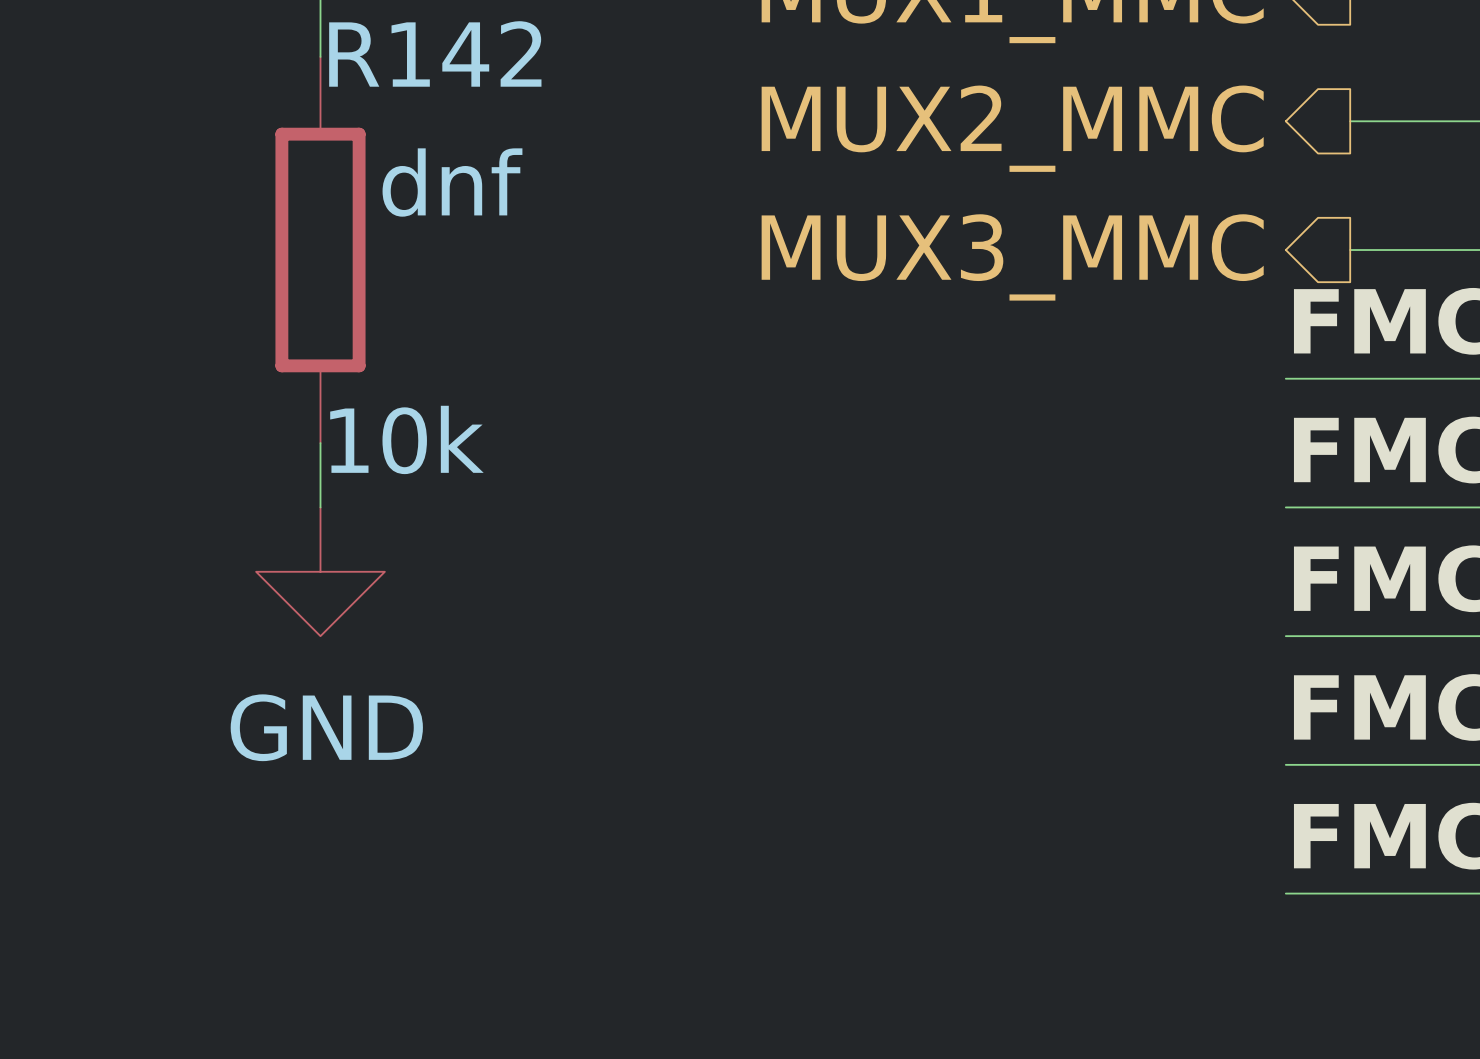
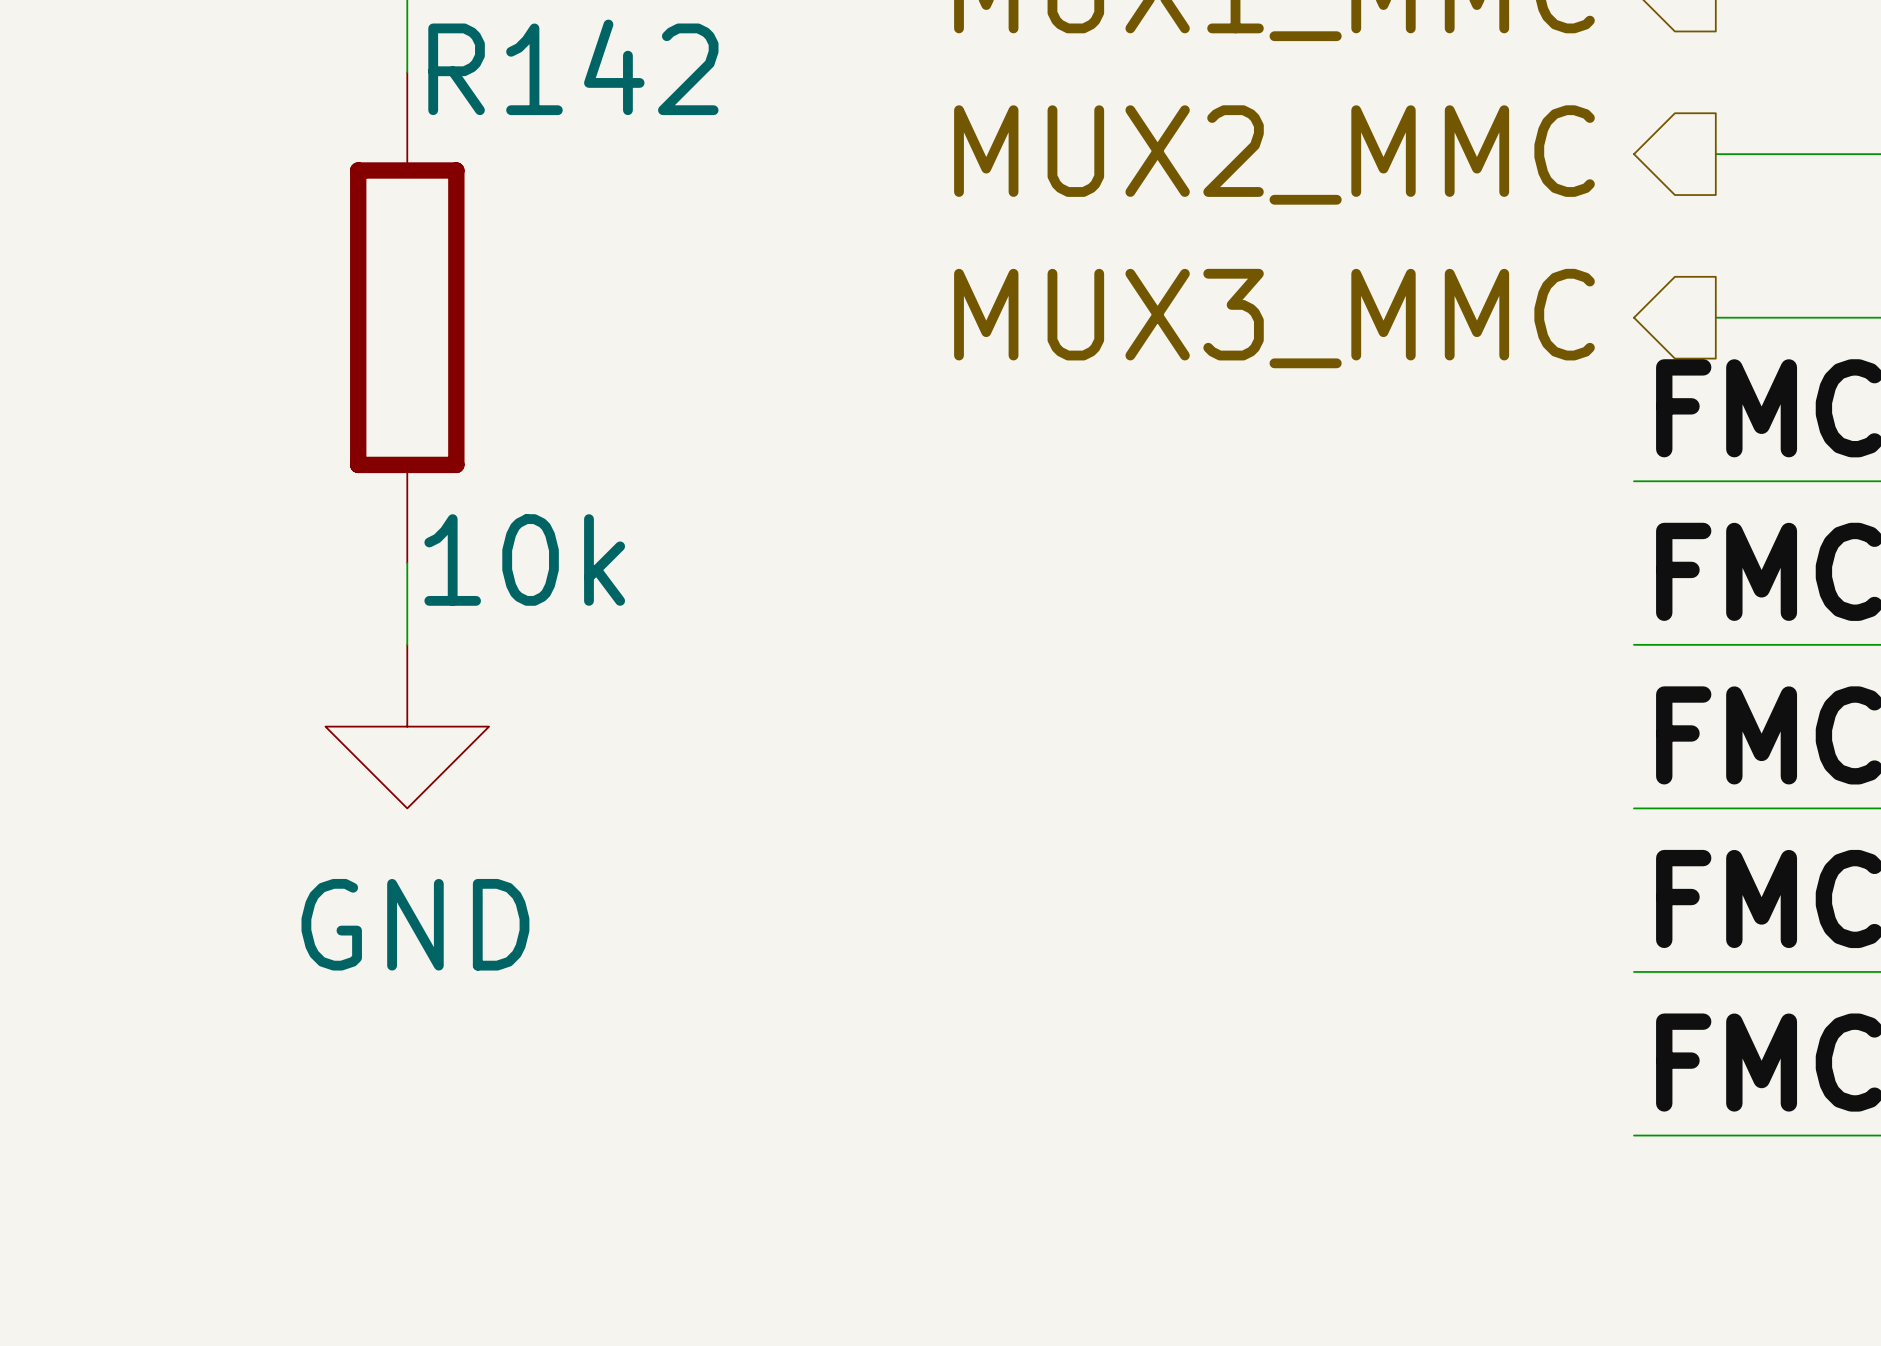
R142 text: dnf (452, 182) -> none

